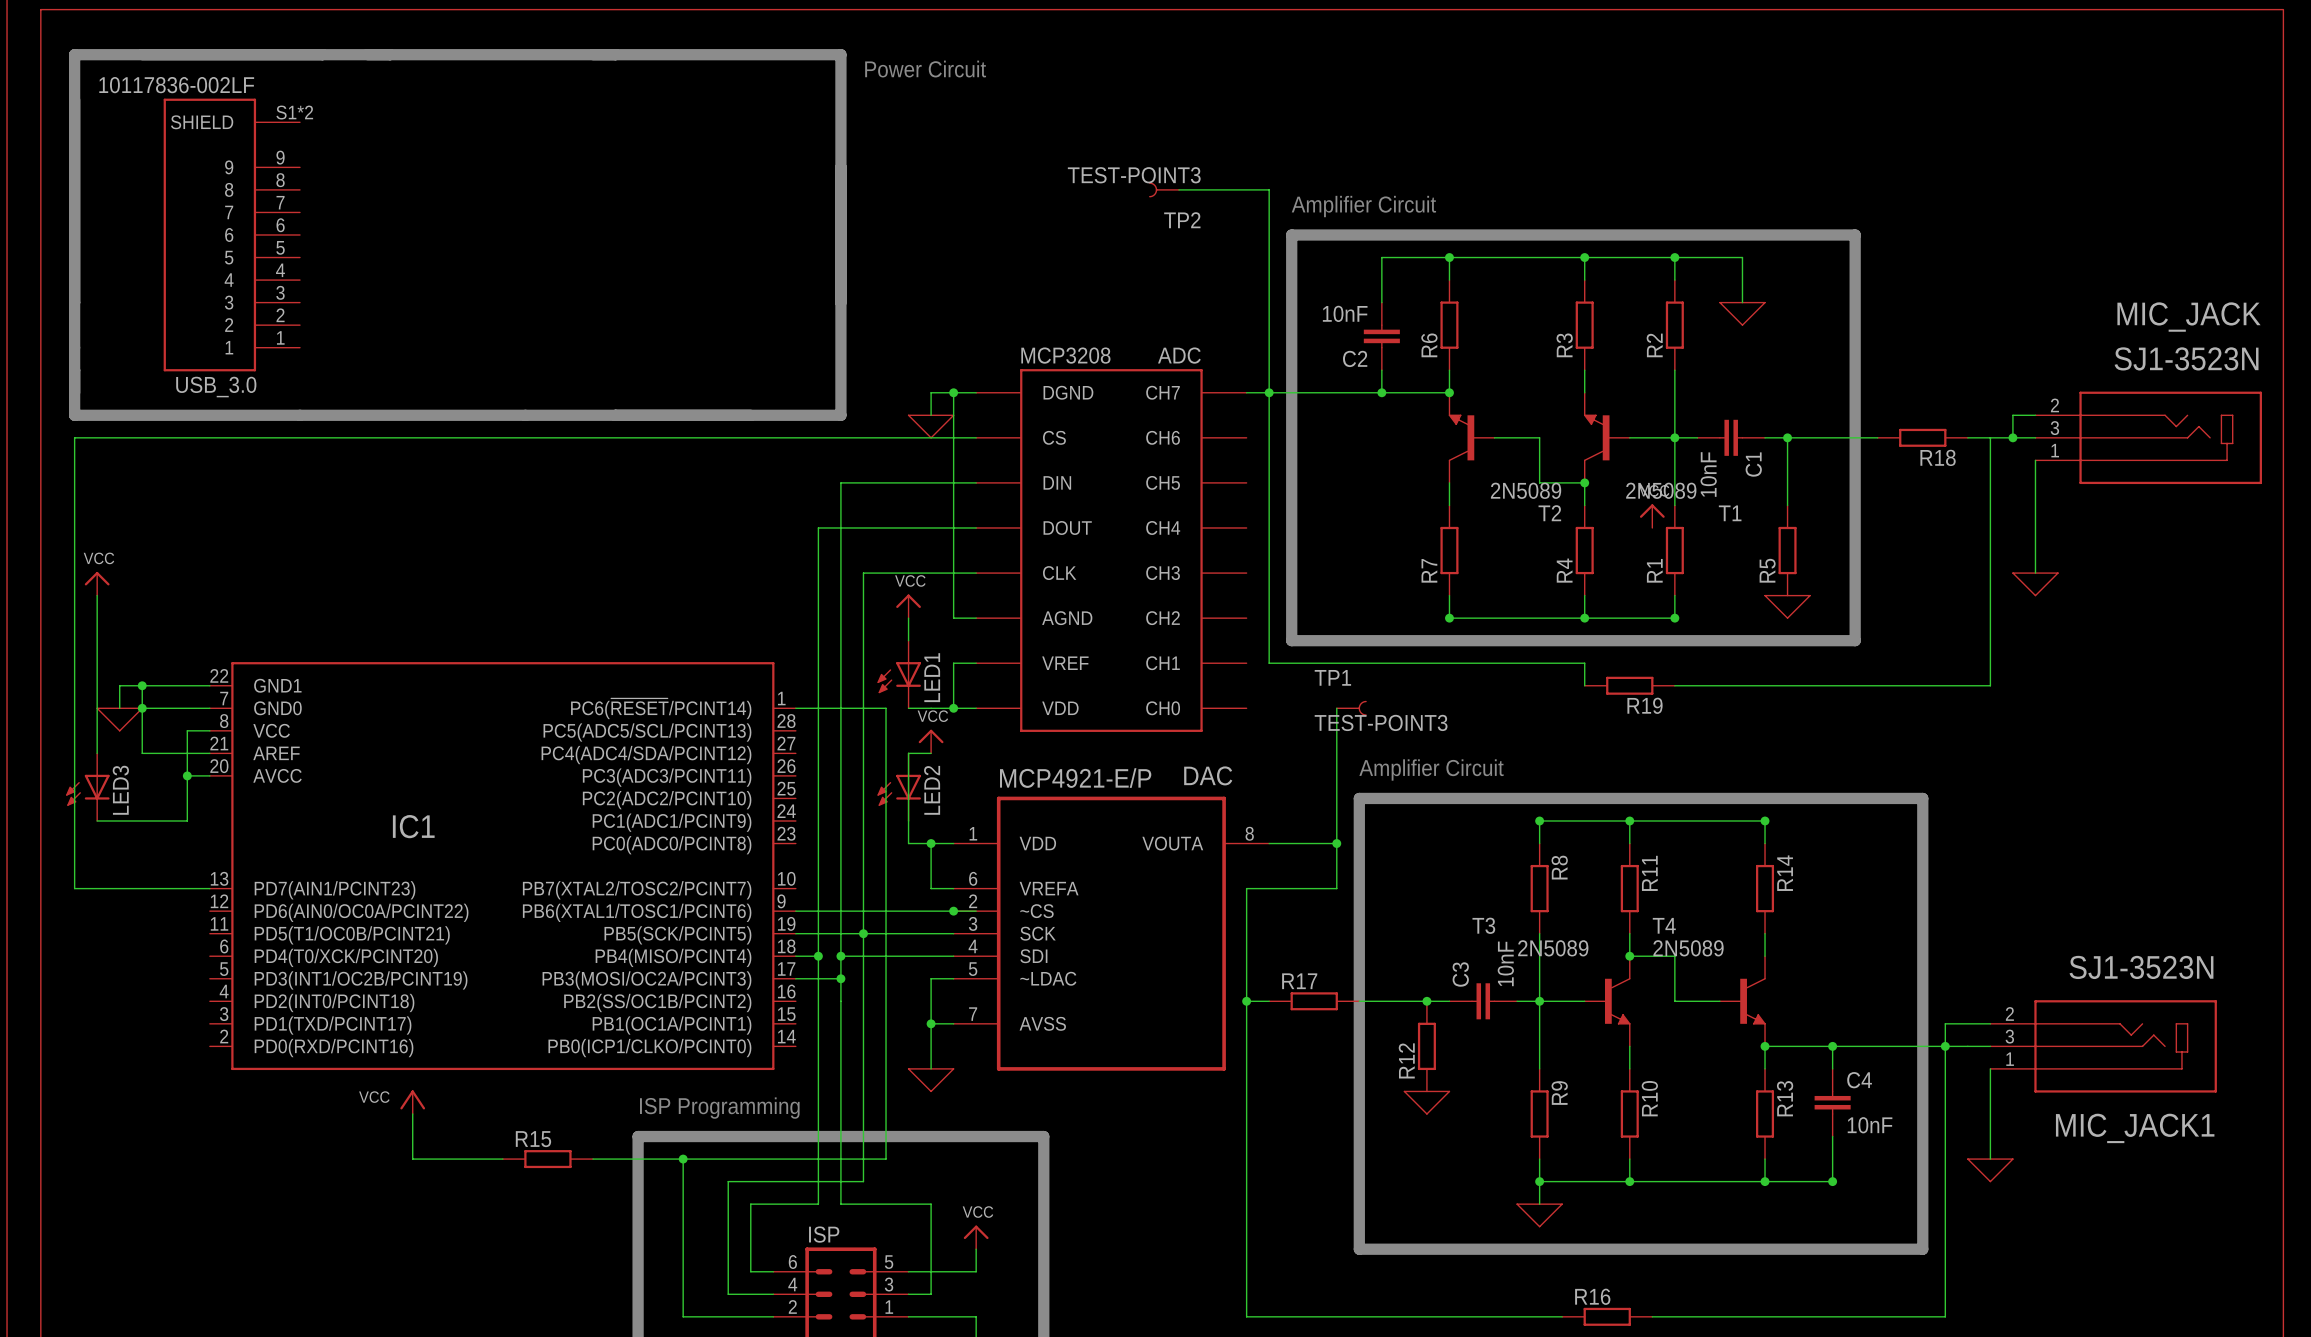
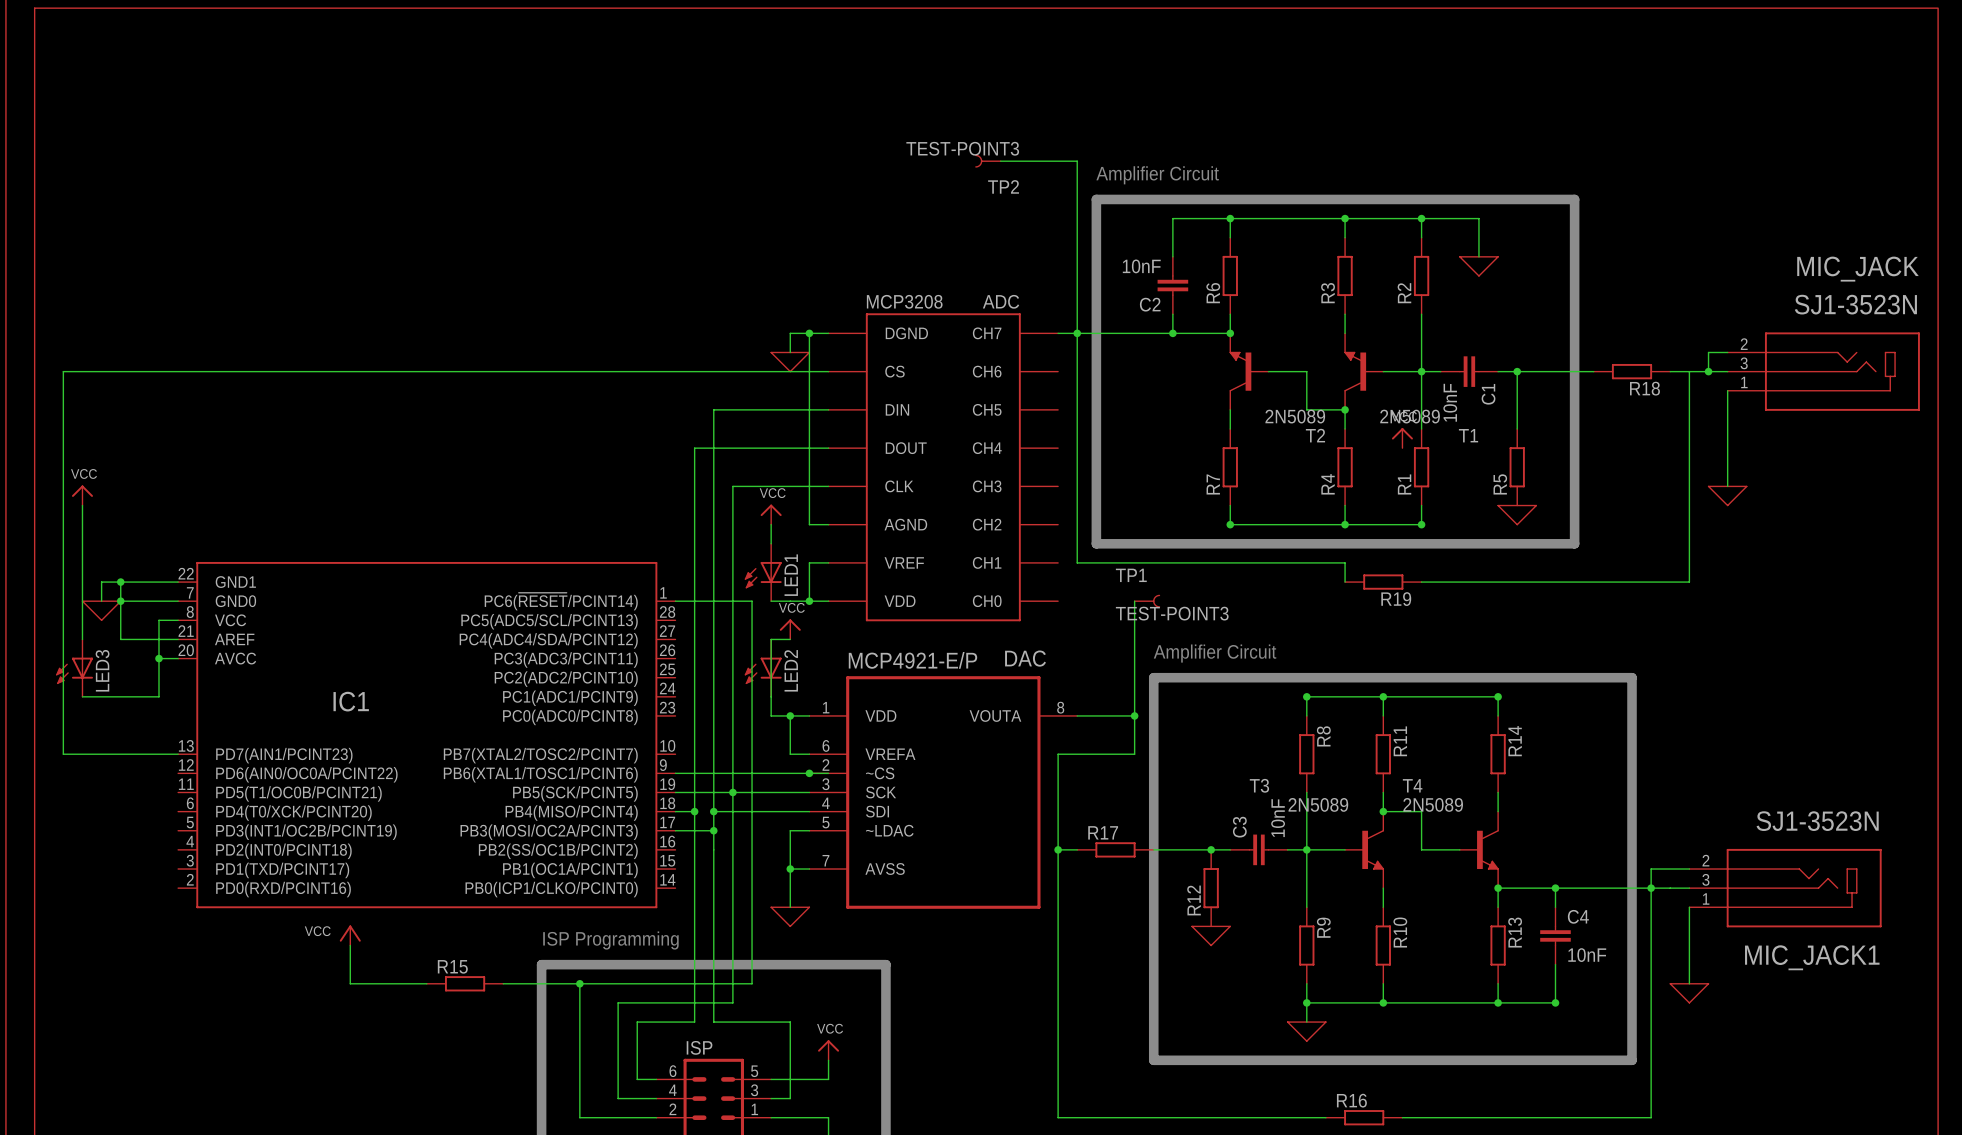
line: (74, 54) (74, 415) (840, 415) (840, 54) (74, 54) -> none
text: Power Circuit (925, 69) -> none
USB_3.0: 10117836-002LF (231, 234) -> none

